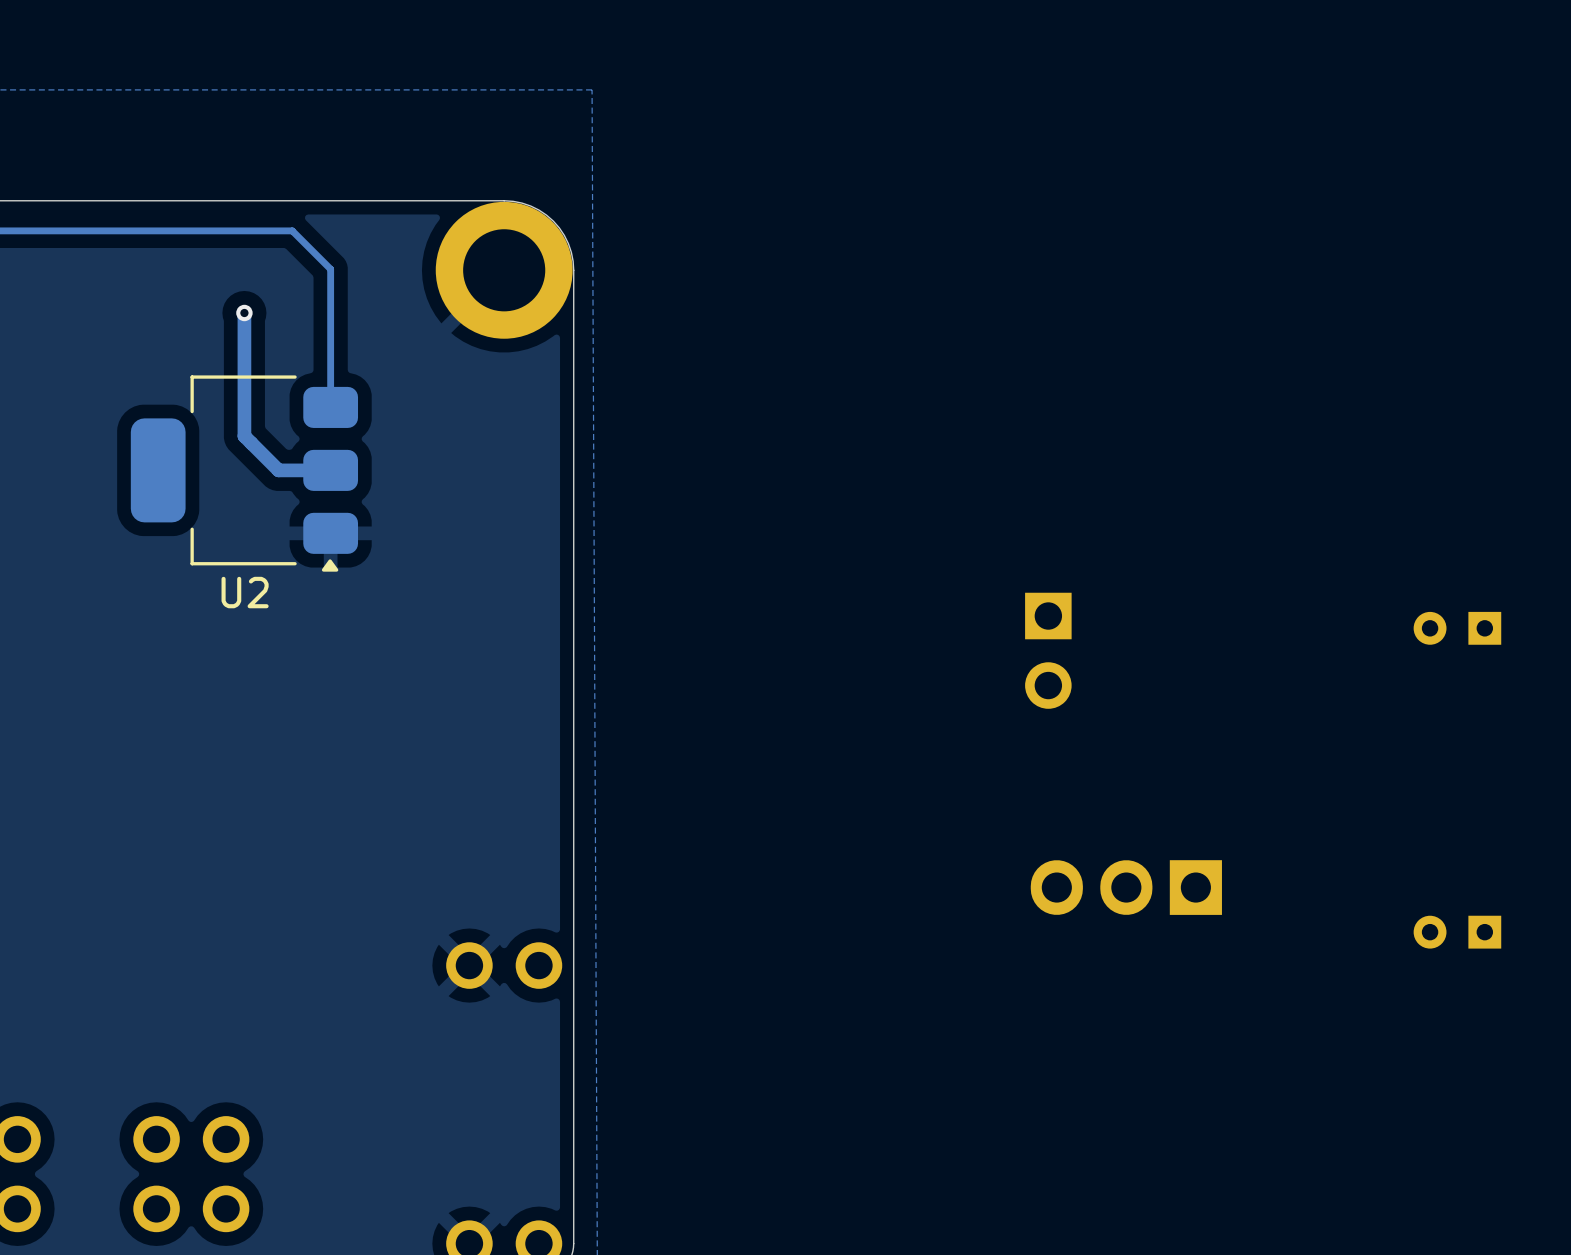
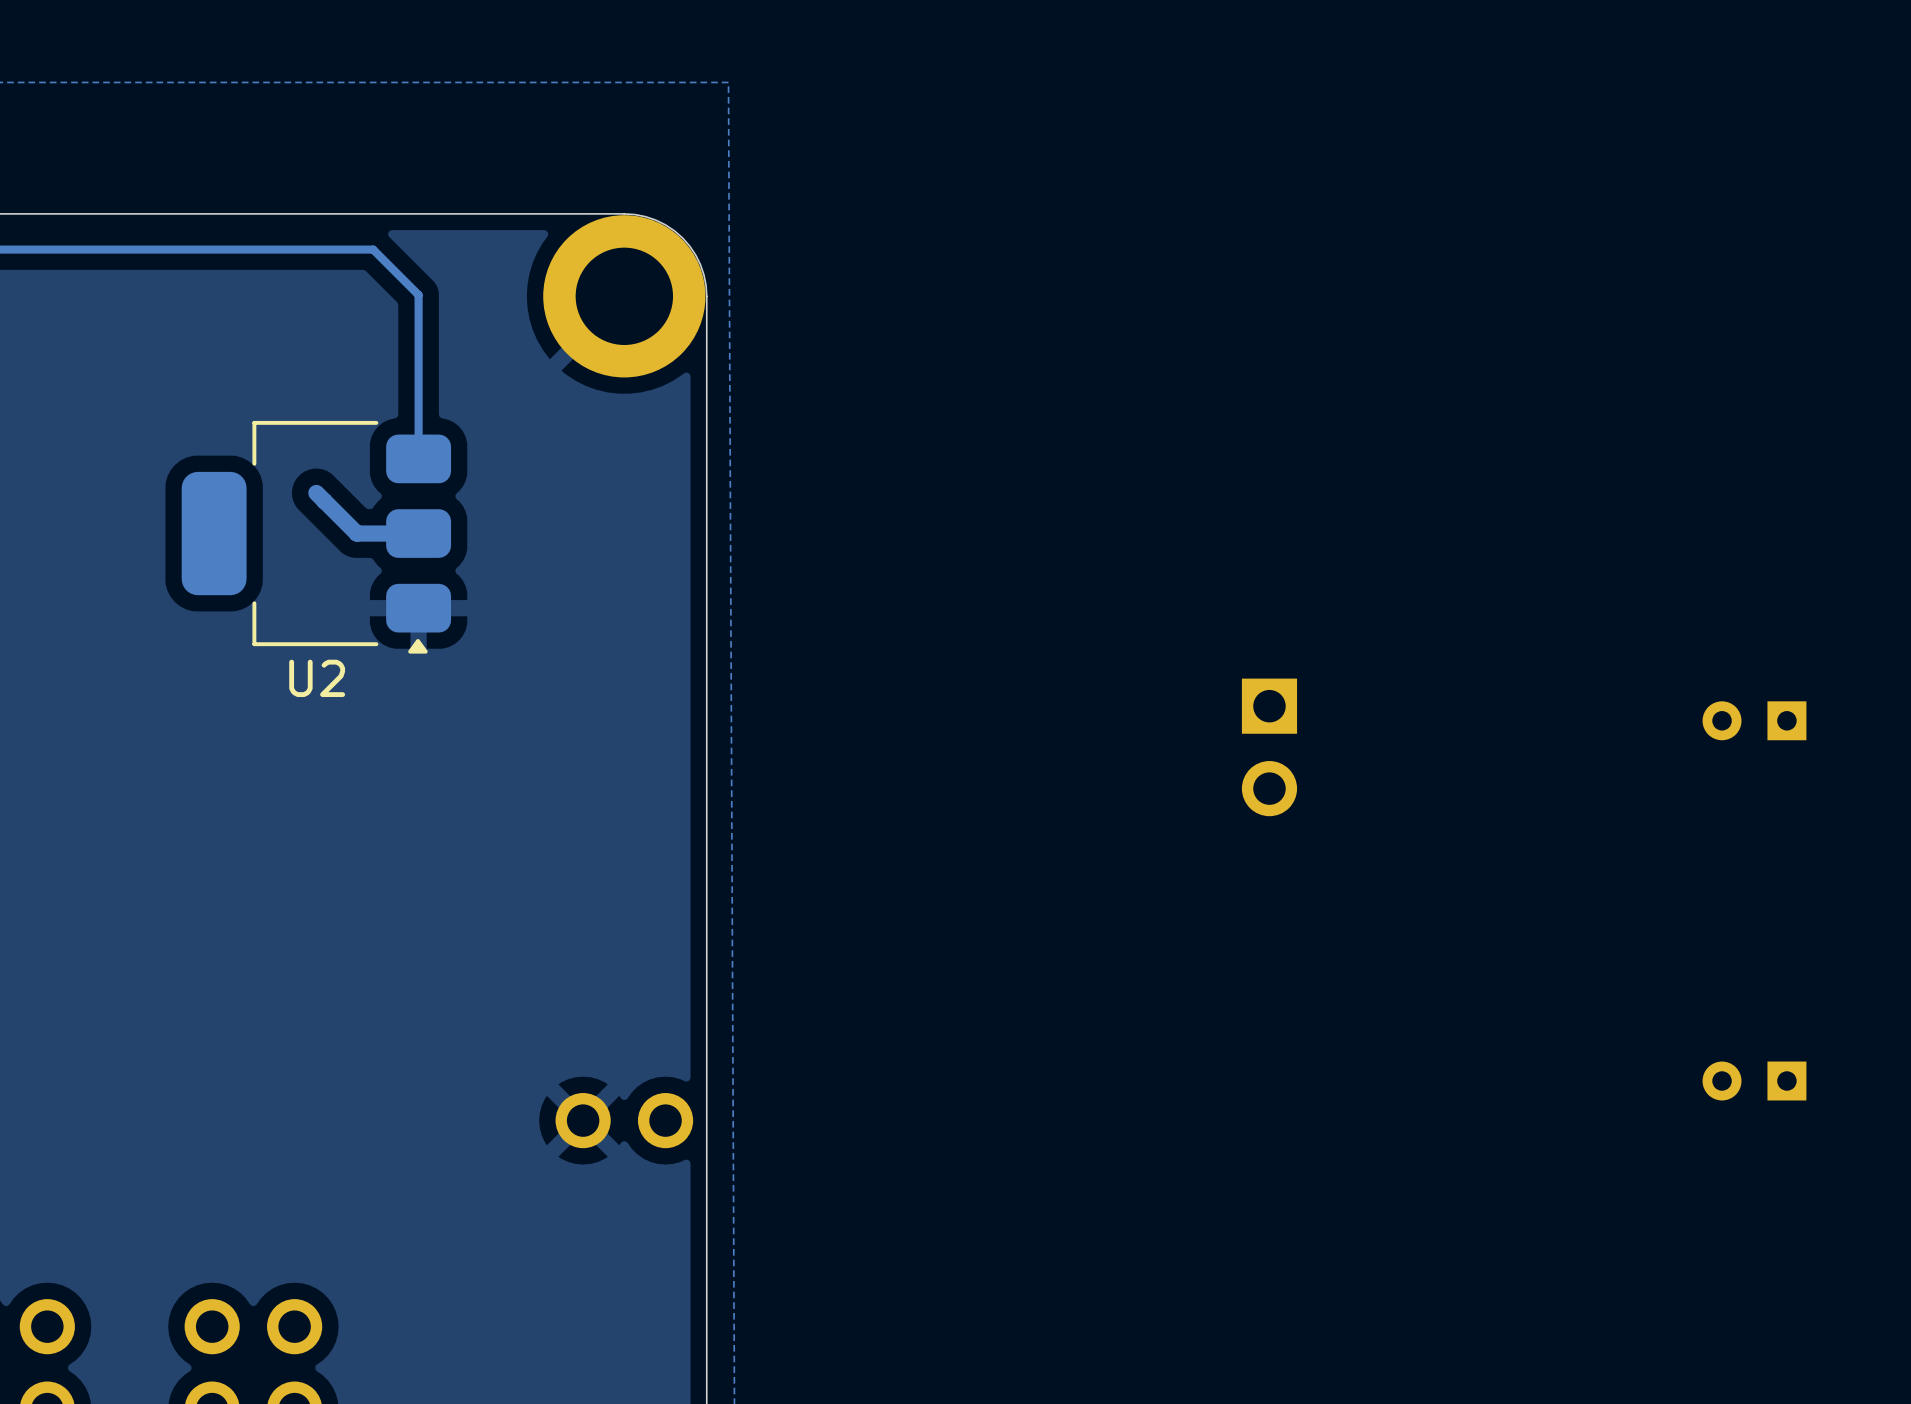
track: (244, 313) (244, 436) -> none
via: (244, 313) -> none
part: (1126, 887) -> none

